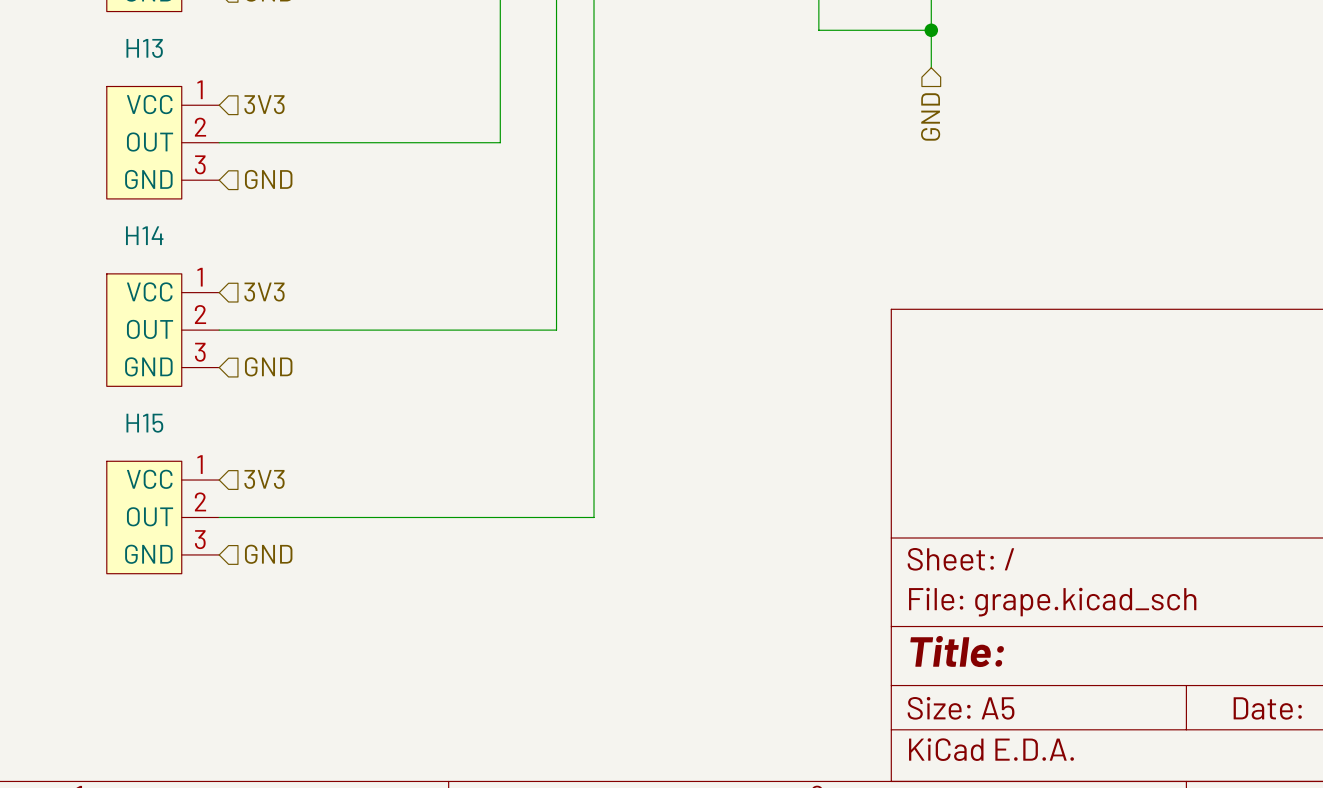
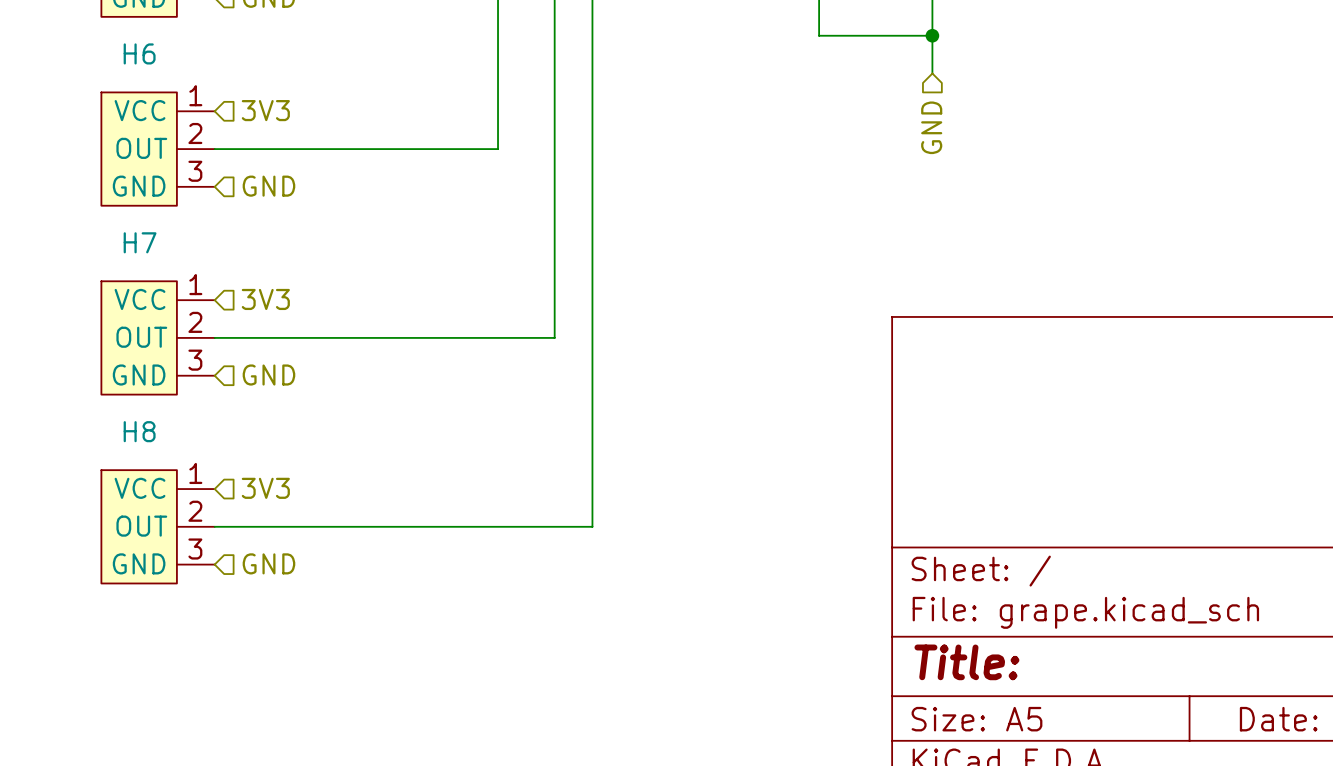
H13 name: H13 (144, 48) -> H6 (139, 53)
H14 name: H14 (144, 235) -> H7 (140, 242)
H15 name: H15 (144, 423) -> H8 (139, 431)

